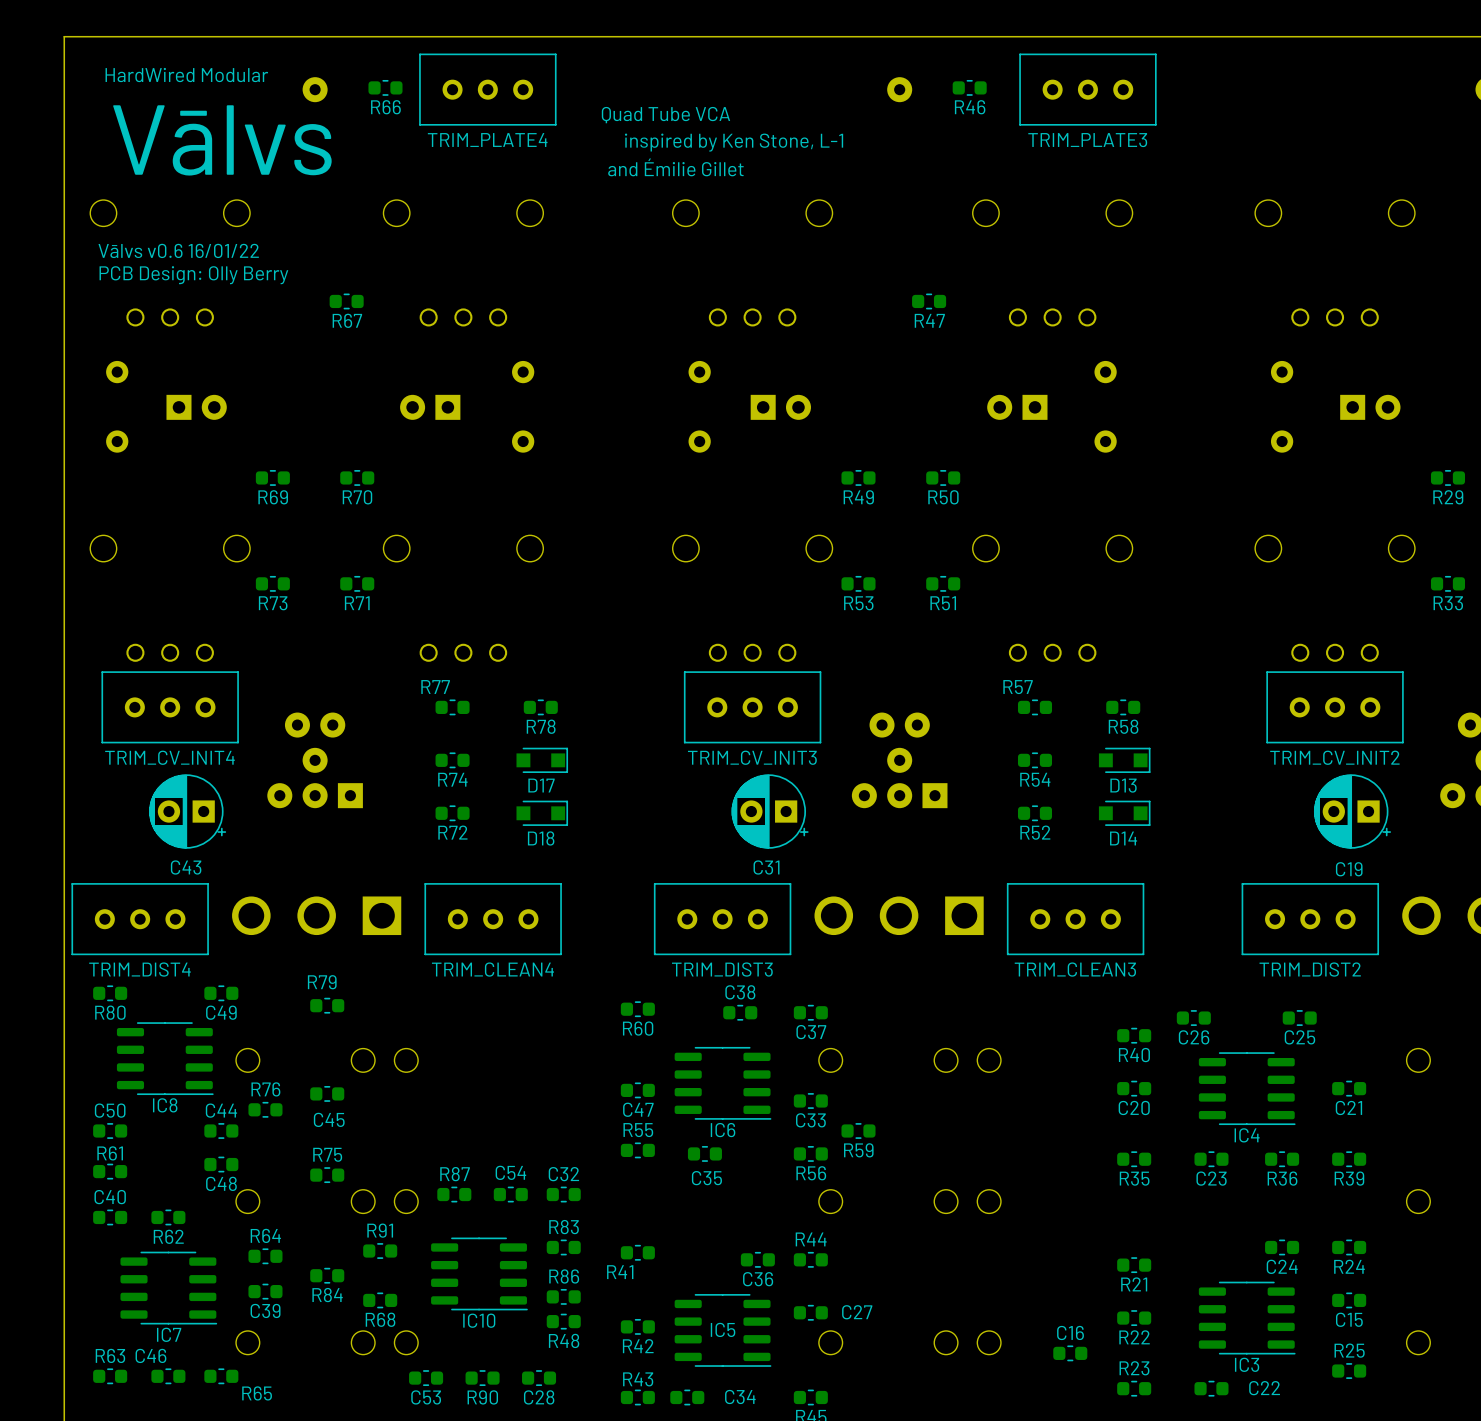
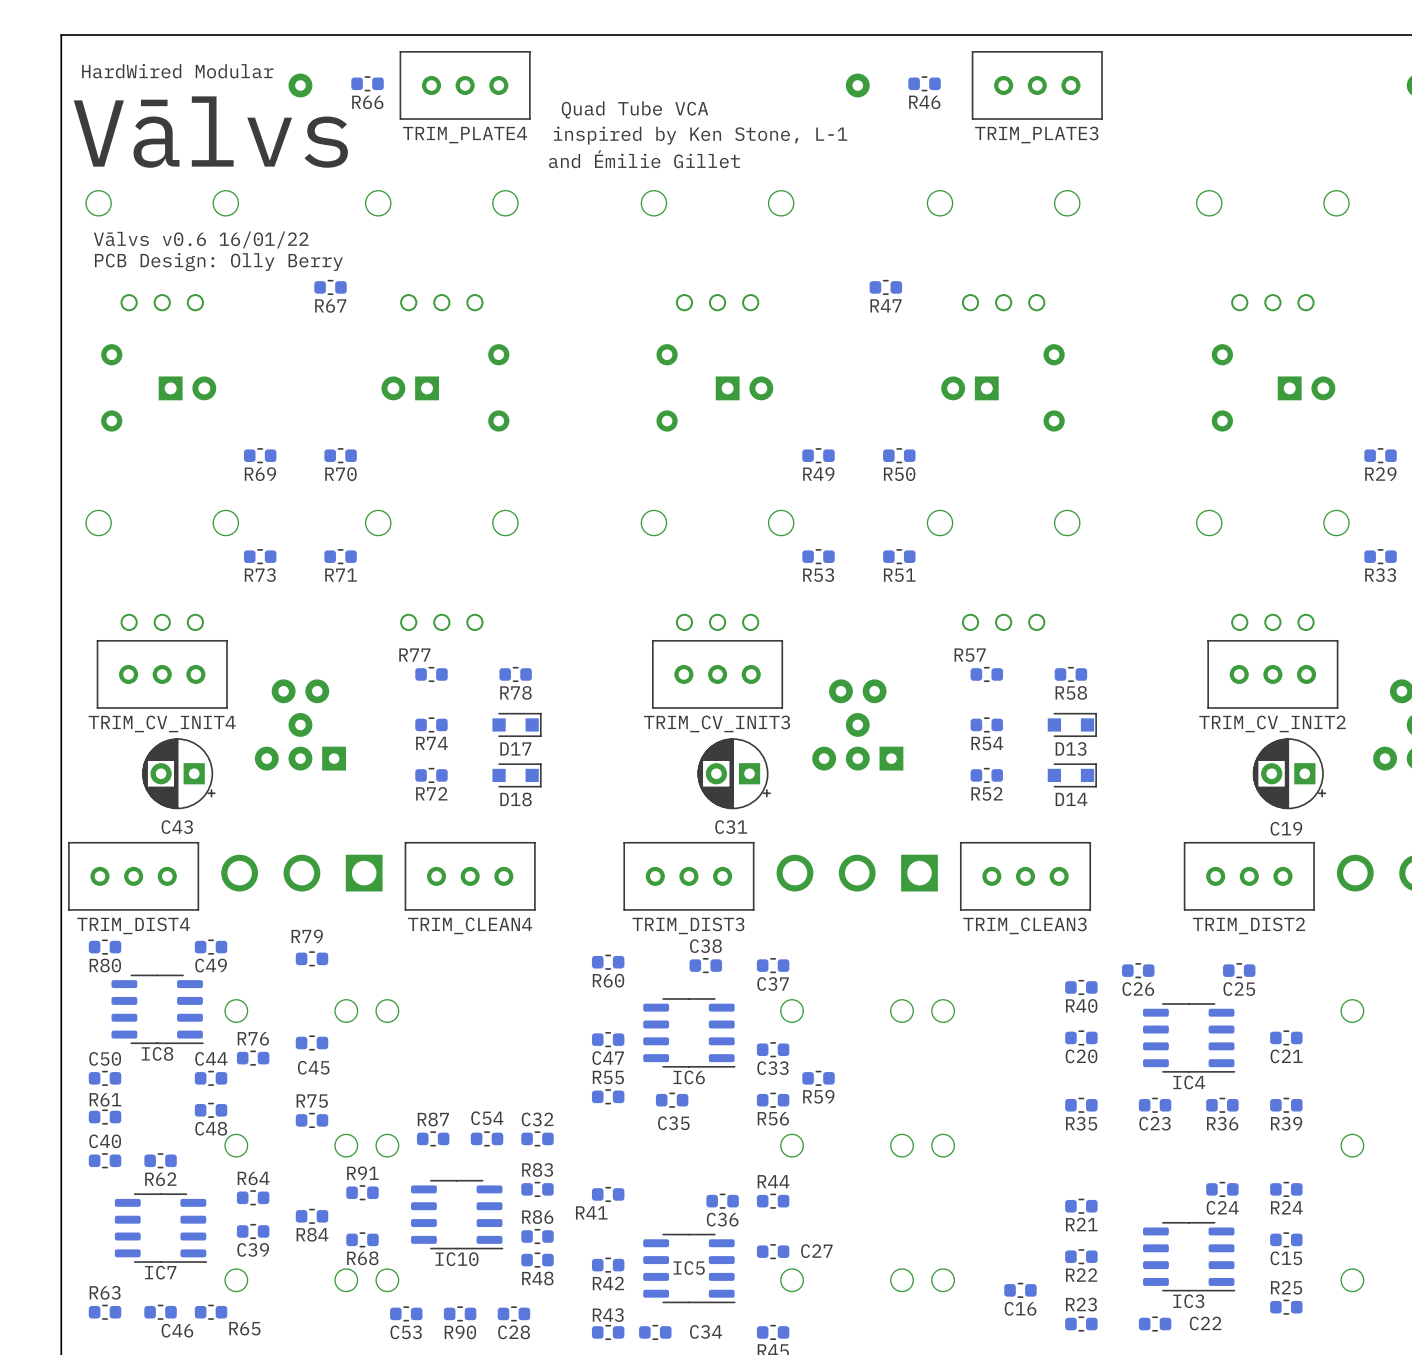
C16 name position: C16 (1070, 1332) -> C16 (1020, 1308)
C46 name position: C46 (150, 1355) -> C46 (177, 1330)

